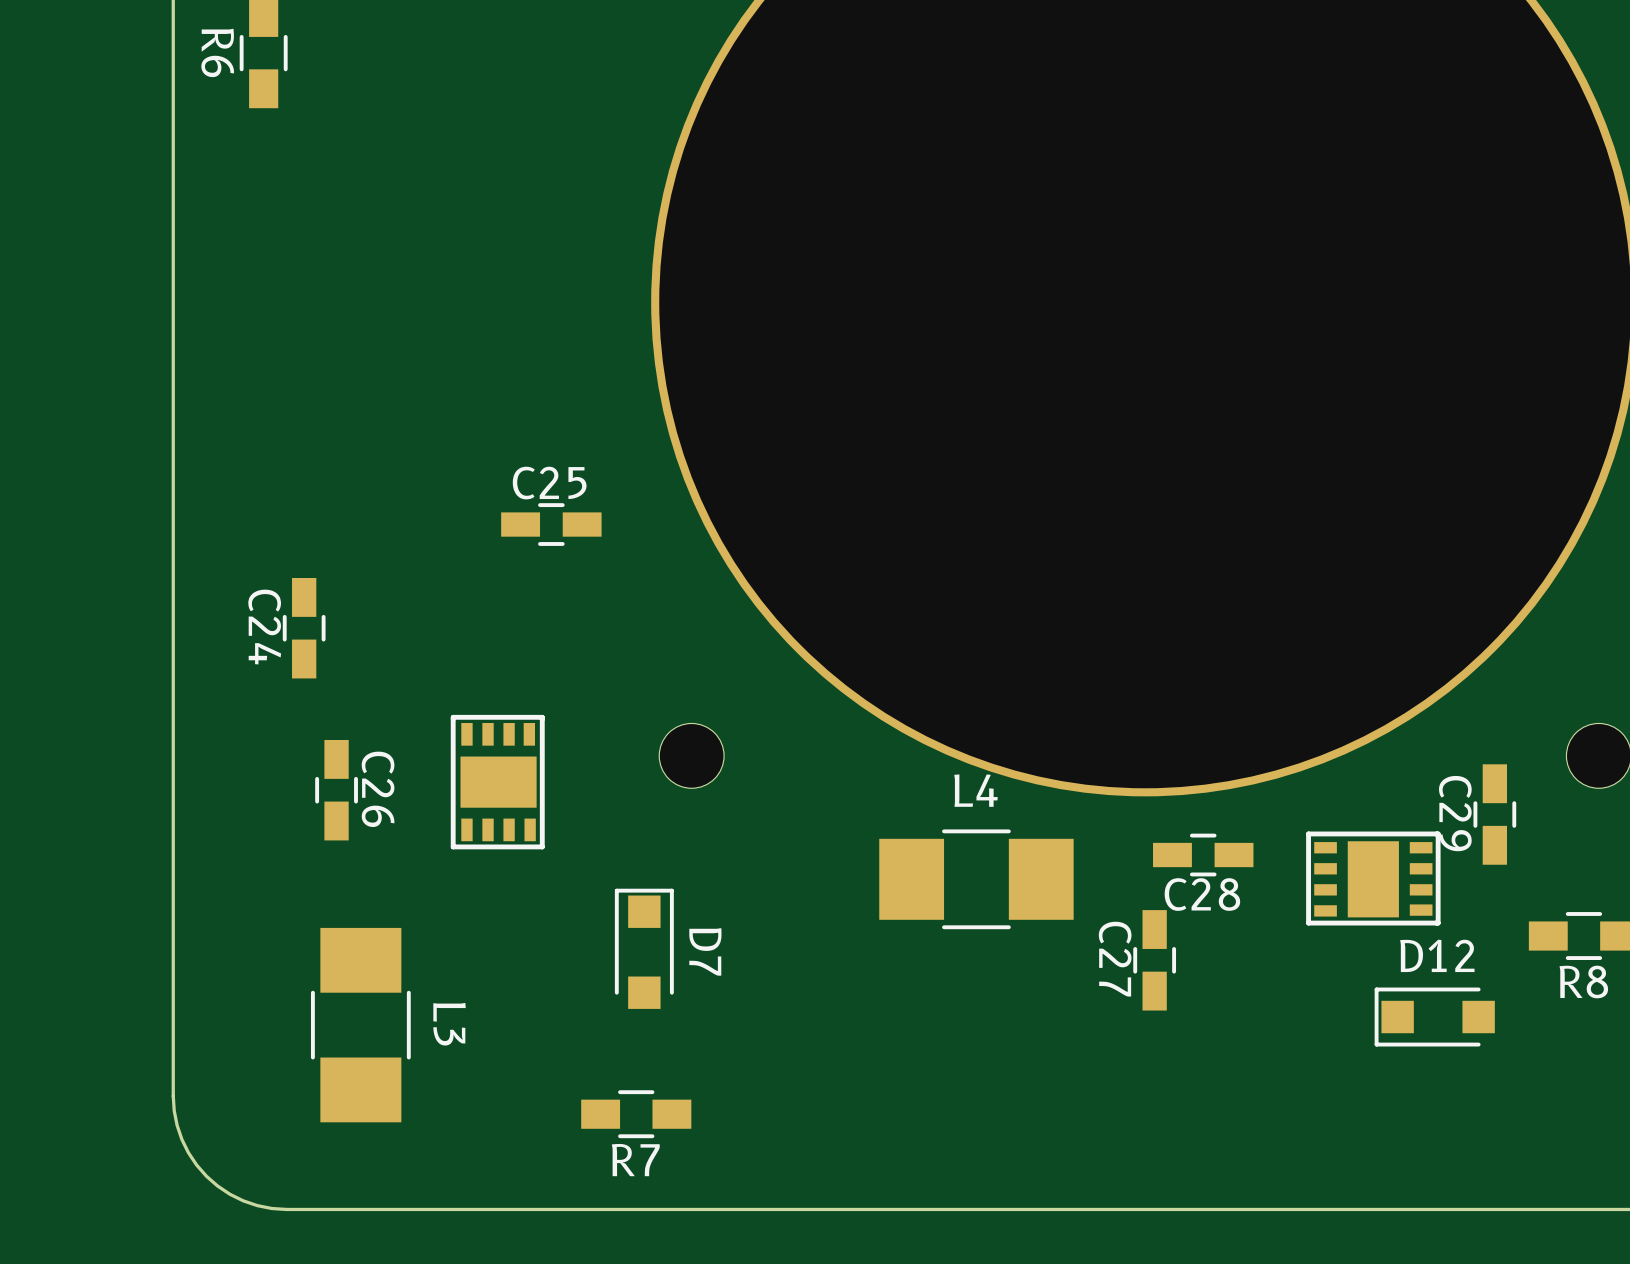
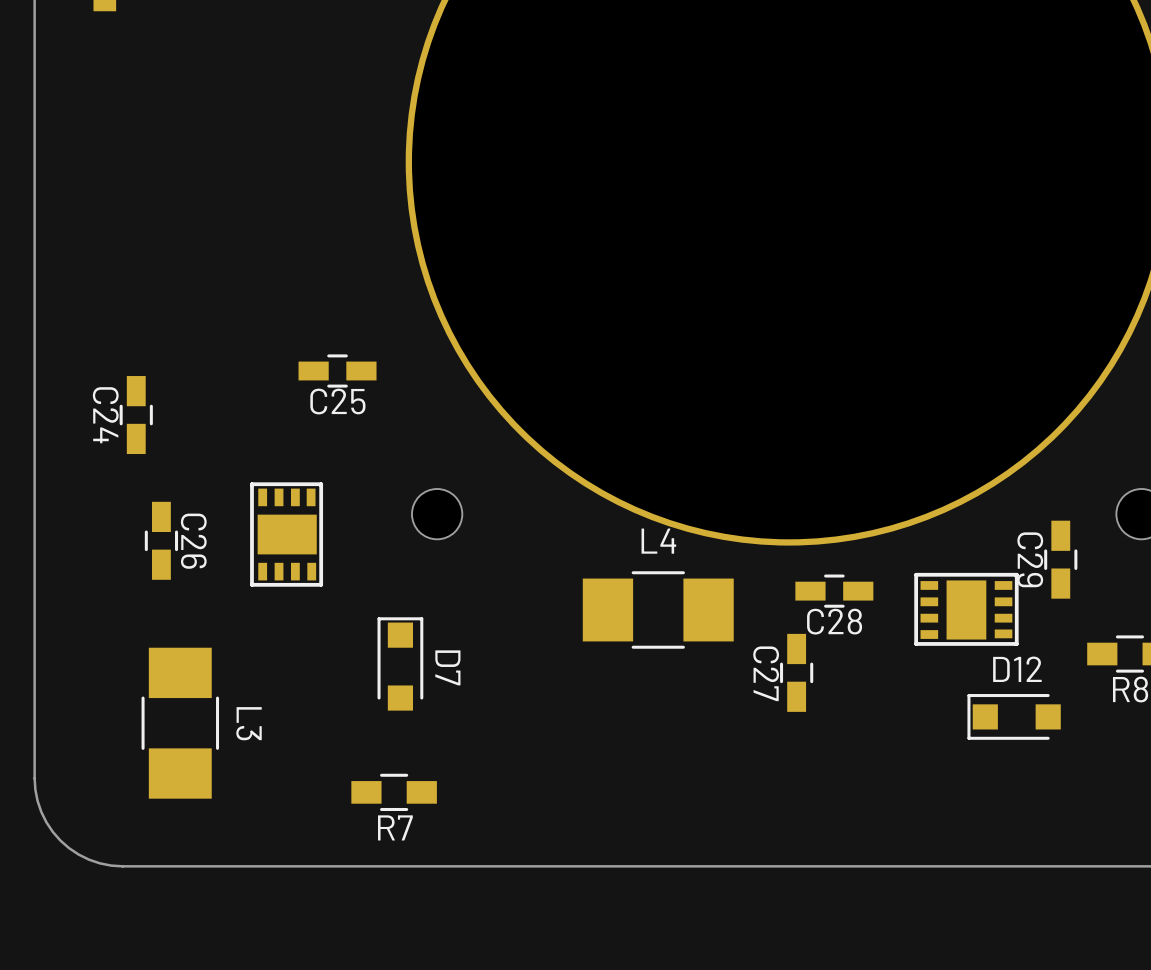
C25 name position: C25 (549, 483) -> C25 (337, 401)
C25 position: (551, 524) -> (337, 371)

